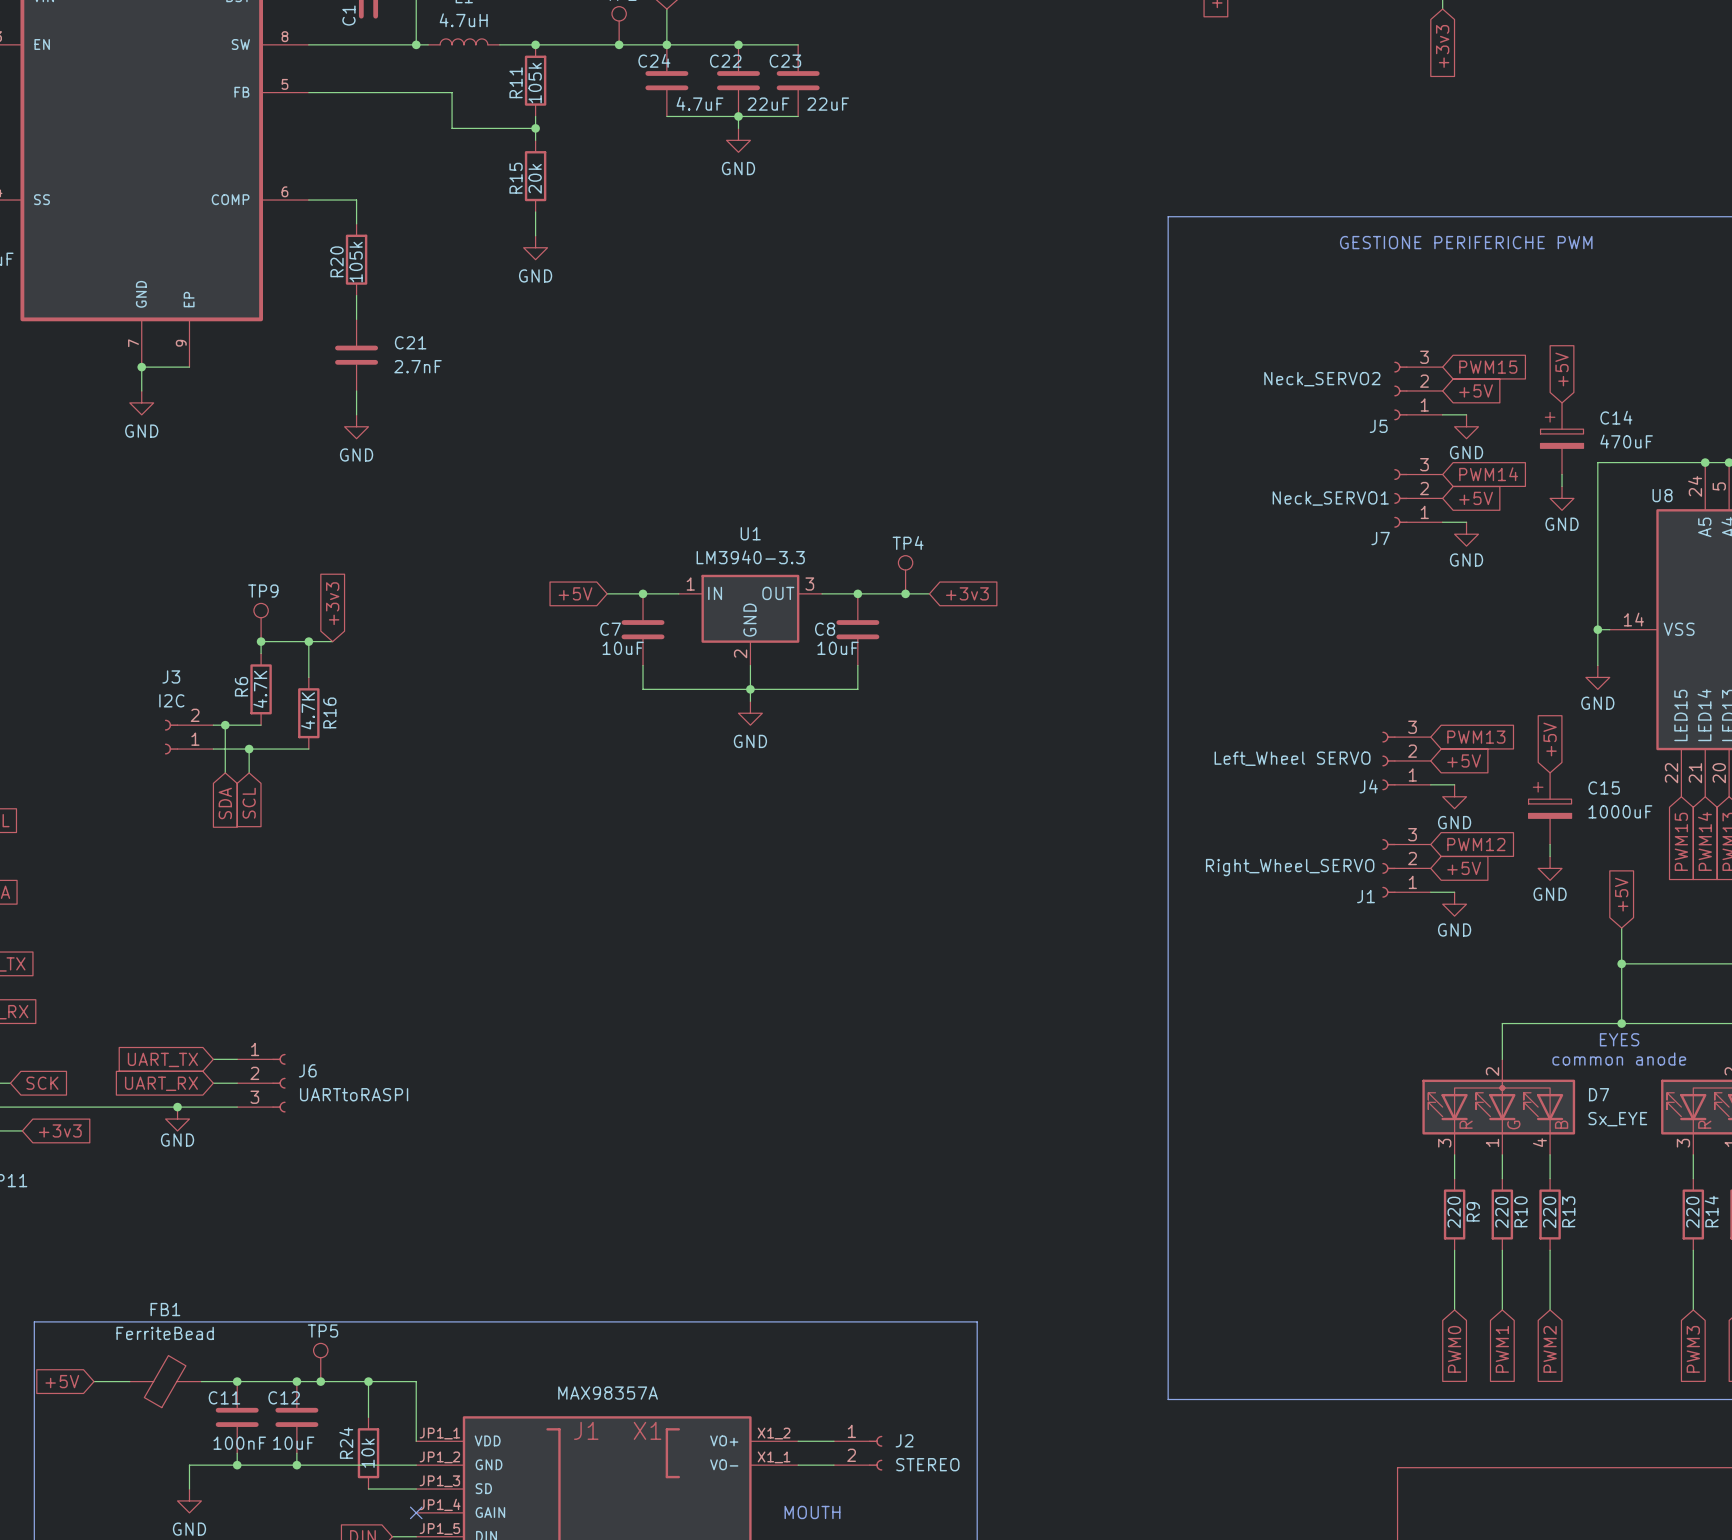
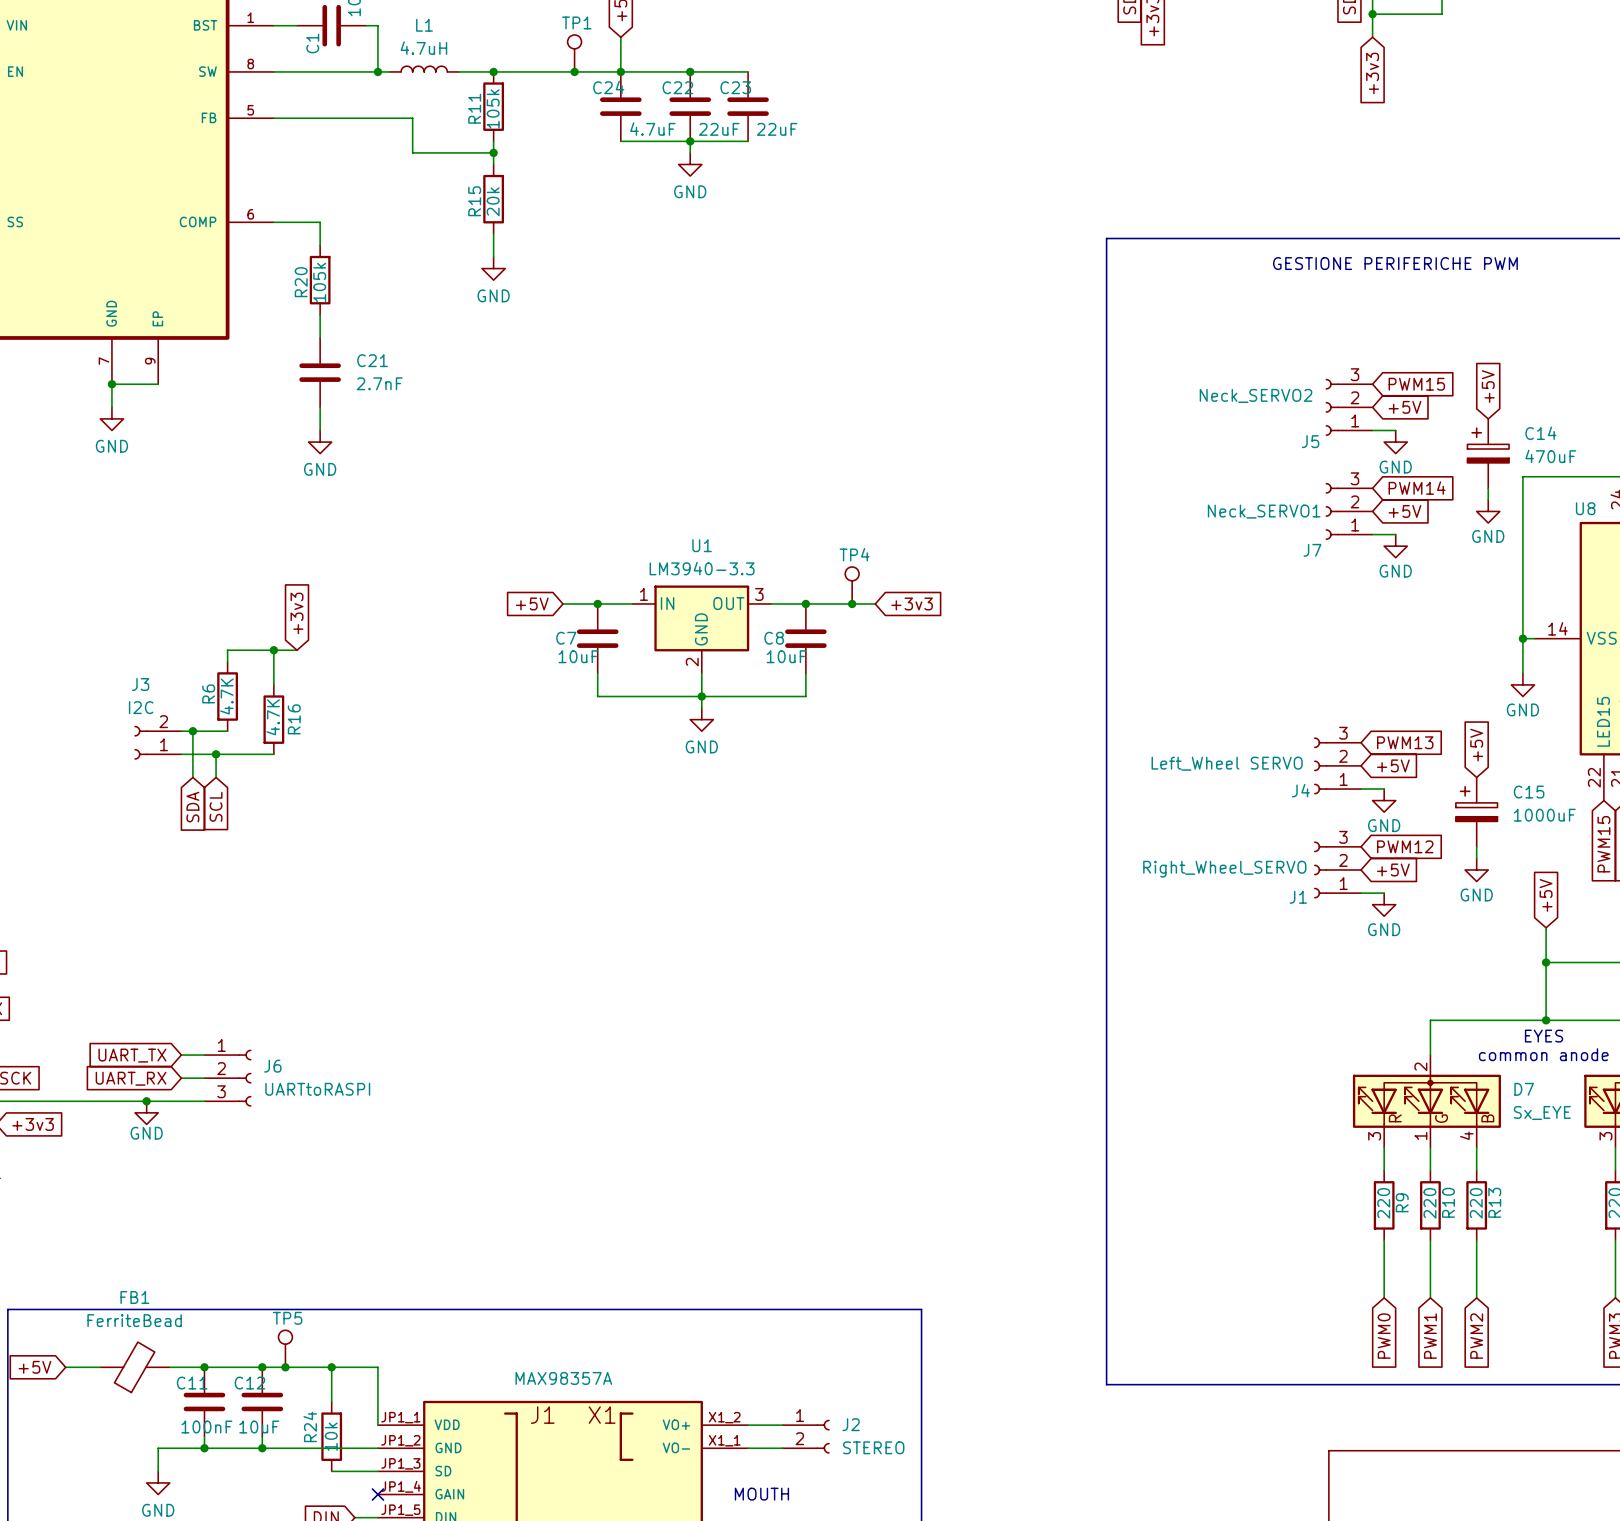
TP9: (261, 622) -> none
junction: (261, 641) -> none

